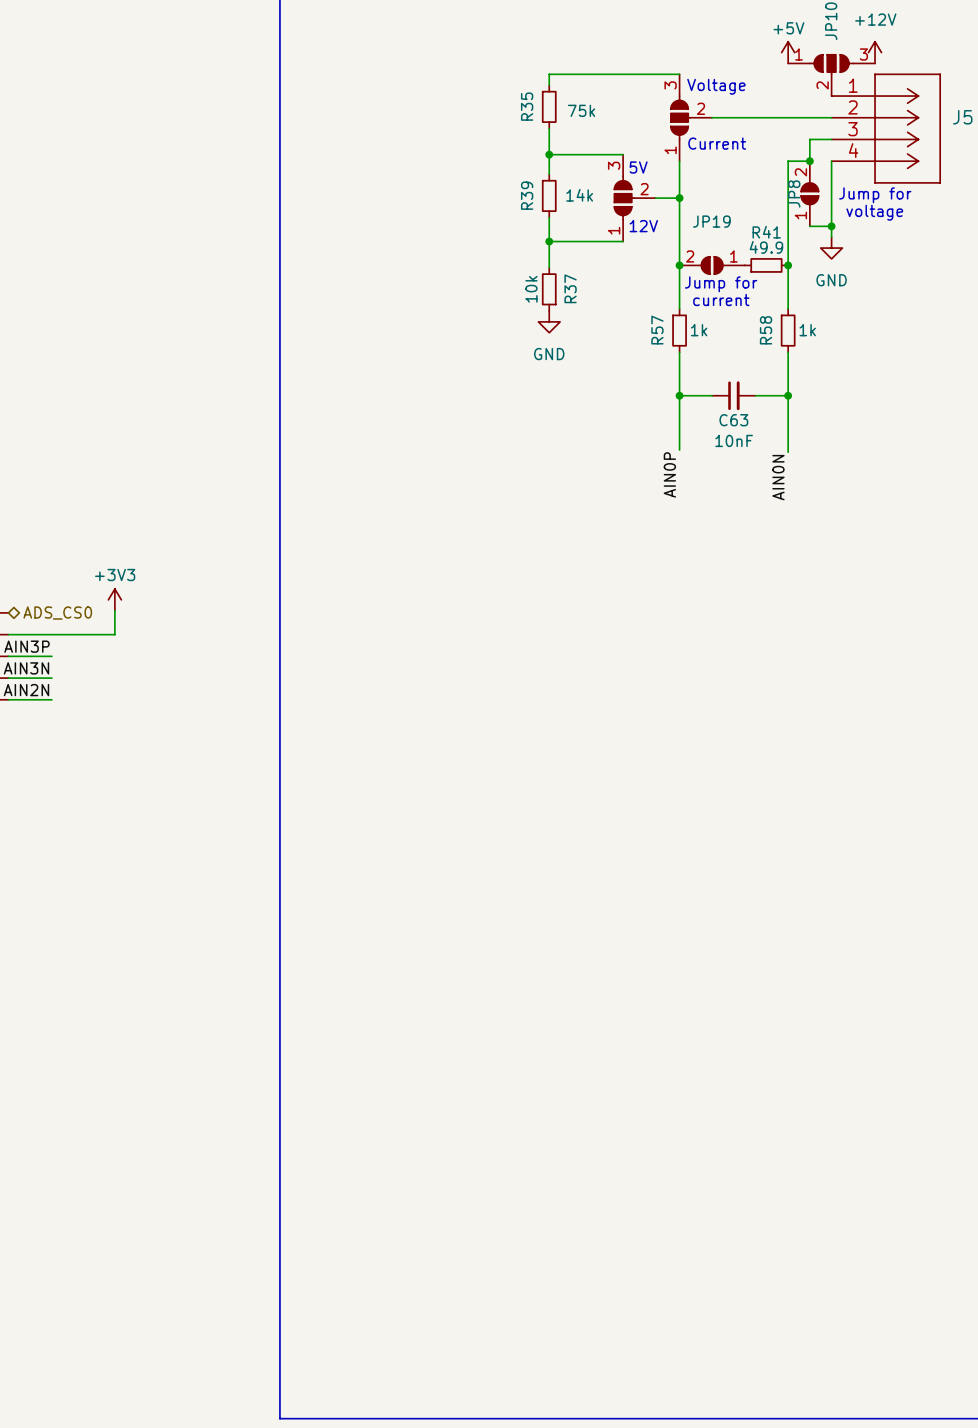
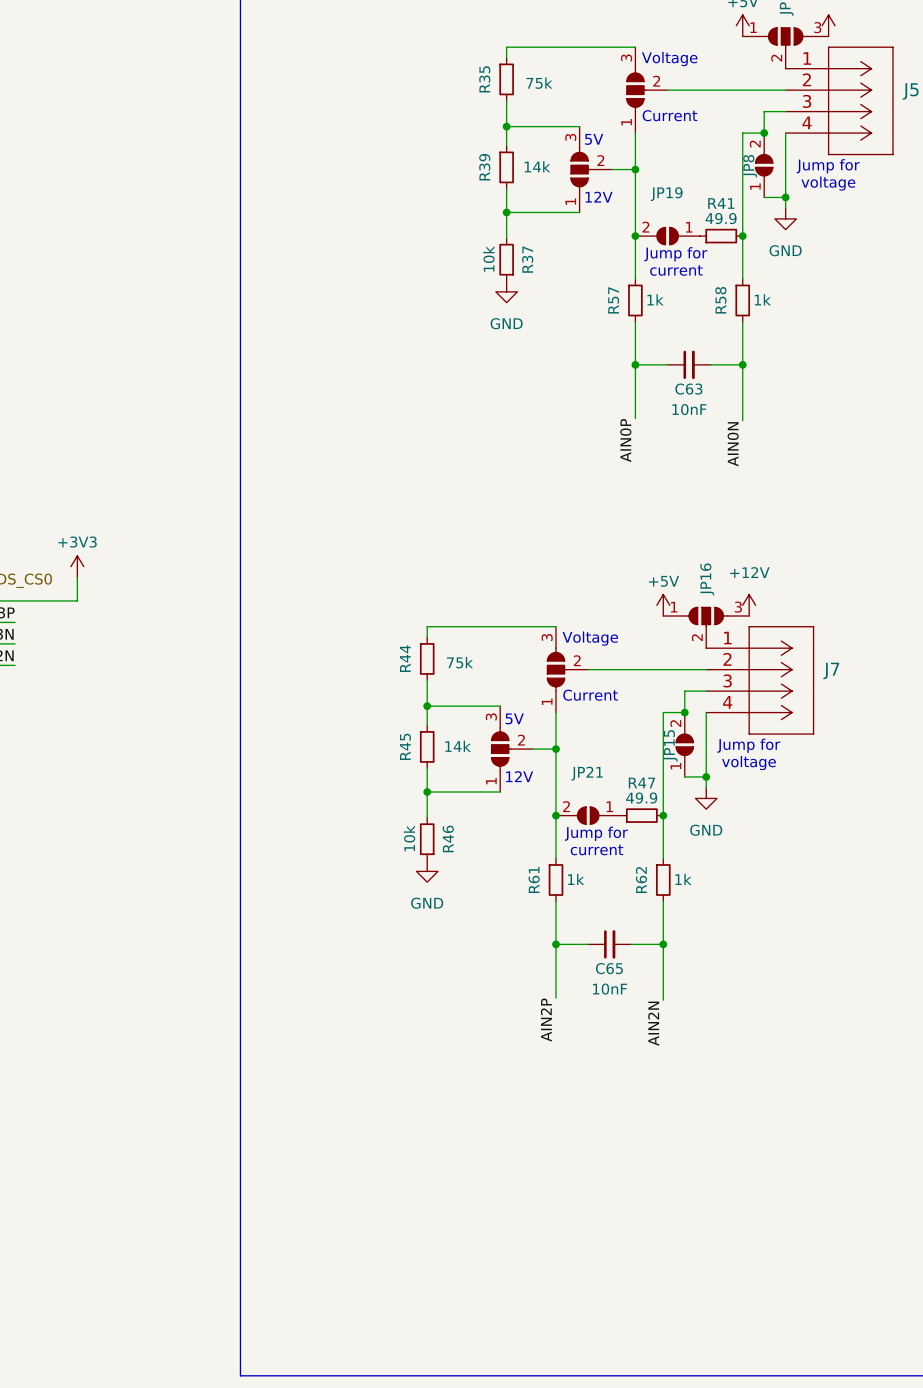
power symbol: none -> +5V (663, 605)
power symbol: none -> +12V (749, 605)
wire: none -> (555, 626) (427, 626) (427, 637)
JP16: none -> (706, 627)
text: none -> Voltage (590, 638)
R44: none -> 75k (427, 658)
part: none -> (567, 669)
wire: none -> (588, 669) (706, 669)
wire: none -> (427, 680) (427, 725)
J7: none -> (760, 680)
wire: none -> (706, 691) (684, 691) (684, 712) (663, 712) (663, 858)
text: none -> Current (590, 695)
wire: none -> (427, 706) (500, 706)
junction: none -> (427, 706)
wire: none -> (555, 712) (555, 858)
junction: none -> (684, 712)
wire: none -> (706, 712) (706, 787)
text: none -> 5V (514, 718)
JP15: none -> (684, 744)
text: none -> Jump for (748, 745)
R45: none -> 14k (427, 746)
part: none -> (511, 749)
wire: none -> (532, 749) (555, 749)
junction: none -> (555, 749)
text: none -> voltage (748, 763)
wire: none -> (427, 768) (427, 817)
text: none -> 12V (519, 776)
wire: none -> (684, 776) (706, 776)
junction: none -> (706, 776)
wire: none -> (427, 792) (500, 792)
junction: none -> (427, 792)
power symbol: none -> GND (706, 798)
junction: none -> (555, 815)
JP21: none -> (588, 815)
R47: none -> 49.9 (641, 815)
junction: none -> (663, 815)
text: none -> Jump for (596, 833)
R46: none -> 10k (427, 839)
text: none -> current (597, 850)
power symbol: none -> GND (427, 871)
R61: none -> 1k (555, 880)
R62: none -> 1k (663, 880)
wire: none -> (555, 901) (555, 998)
wire: none -> (663, 901) (663, 1000)
wire: none -> (555, 944) (588, 944)
junction: none -> (555, 944)
C65: none -> 10nF (609, 944)
wire: none -> (631, 944) (663, 944)
junction: none -> (663, 944)
label: none -> AIN2P (546, 1020)
label: none -> AIN2N (653, 1023)

